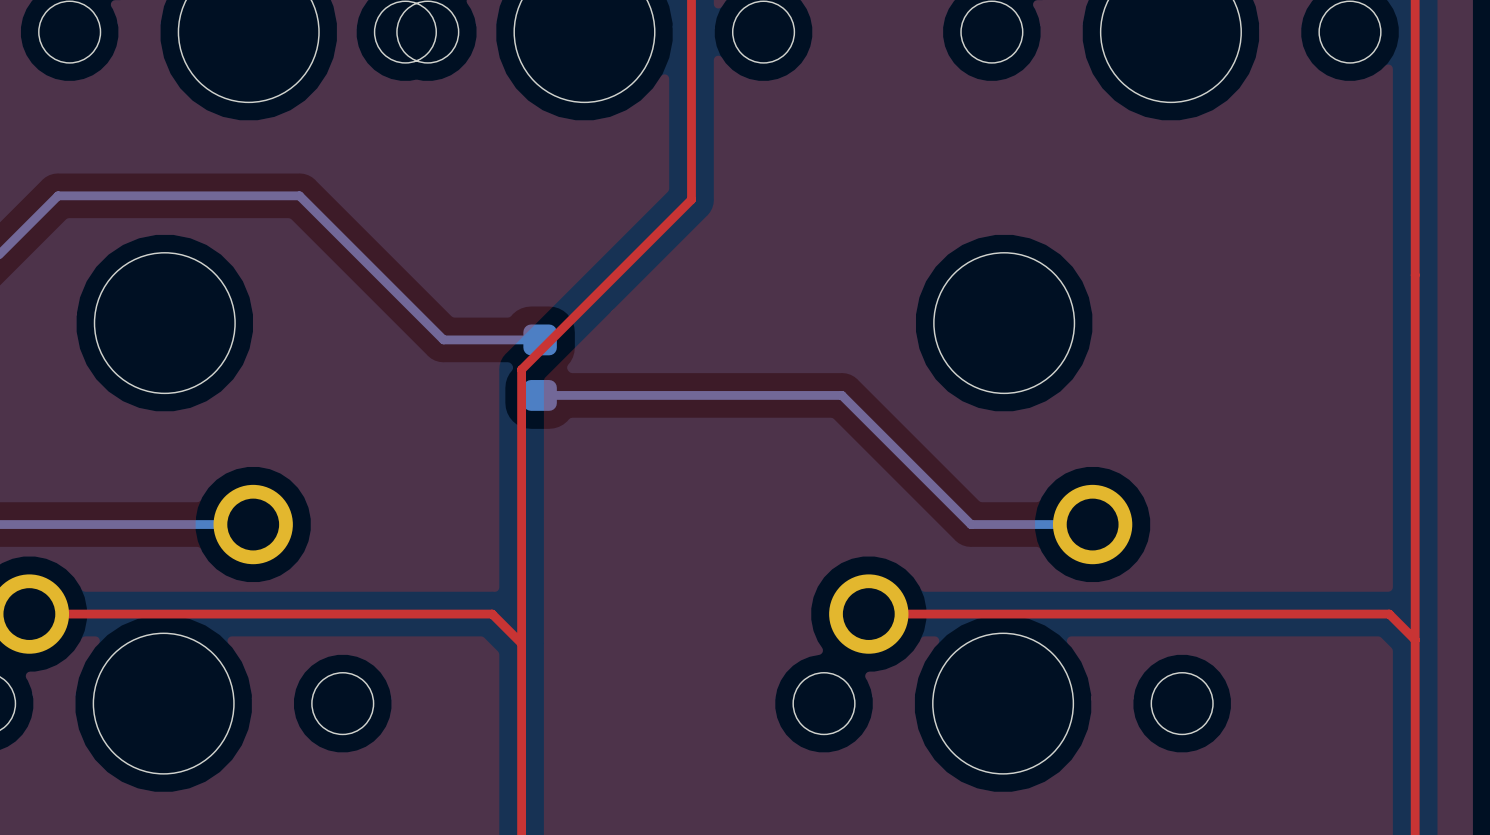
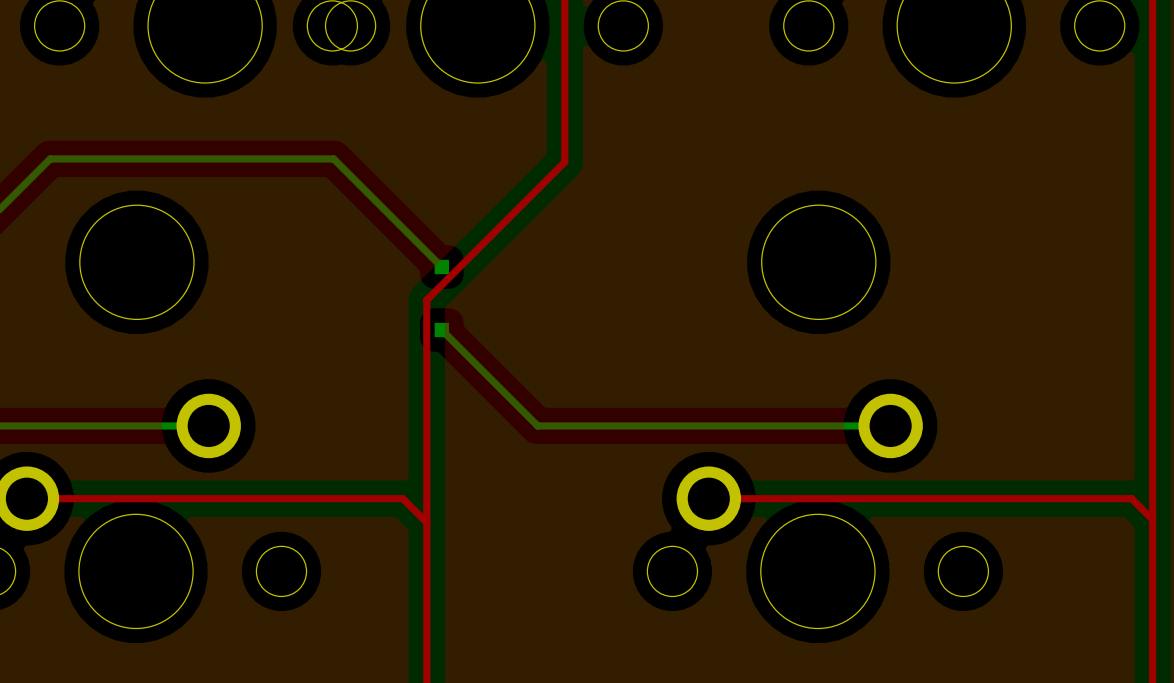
bottom track: (299, 195) (443, 339) (540, 339) -> (246, 158) (333, 158) (441, 267)
part footprint: [523, 324, 557, 411] -> [434, 259, 449, 338]
bottom track: (540, 395) (841, 395) (971, 524) -> (441, 330) (537, 425) (791, 425)

